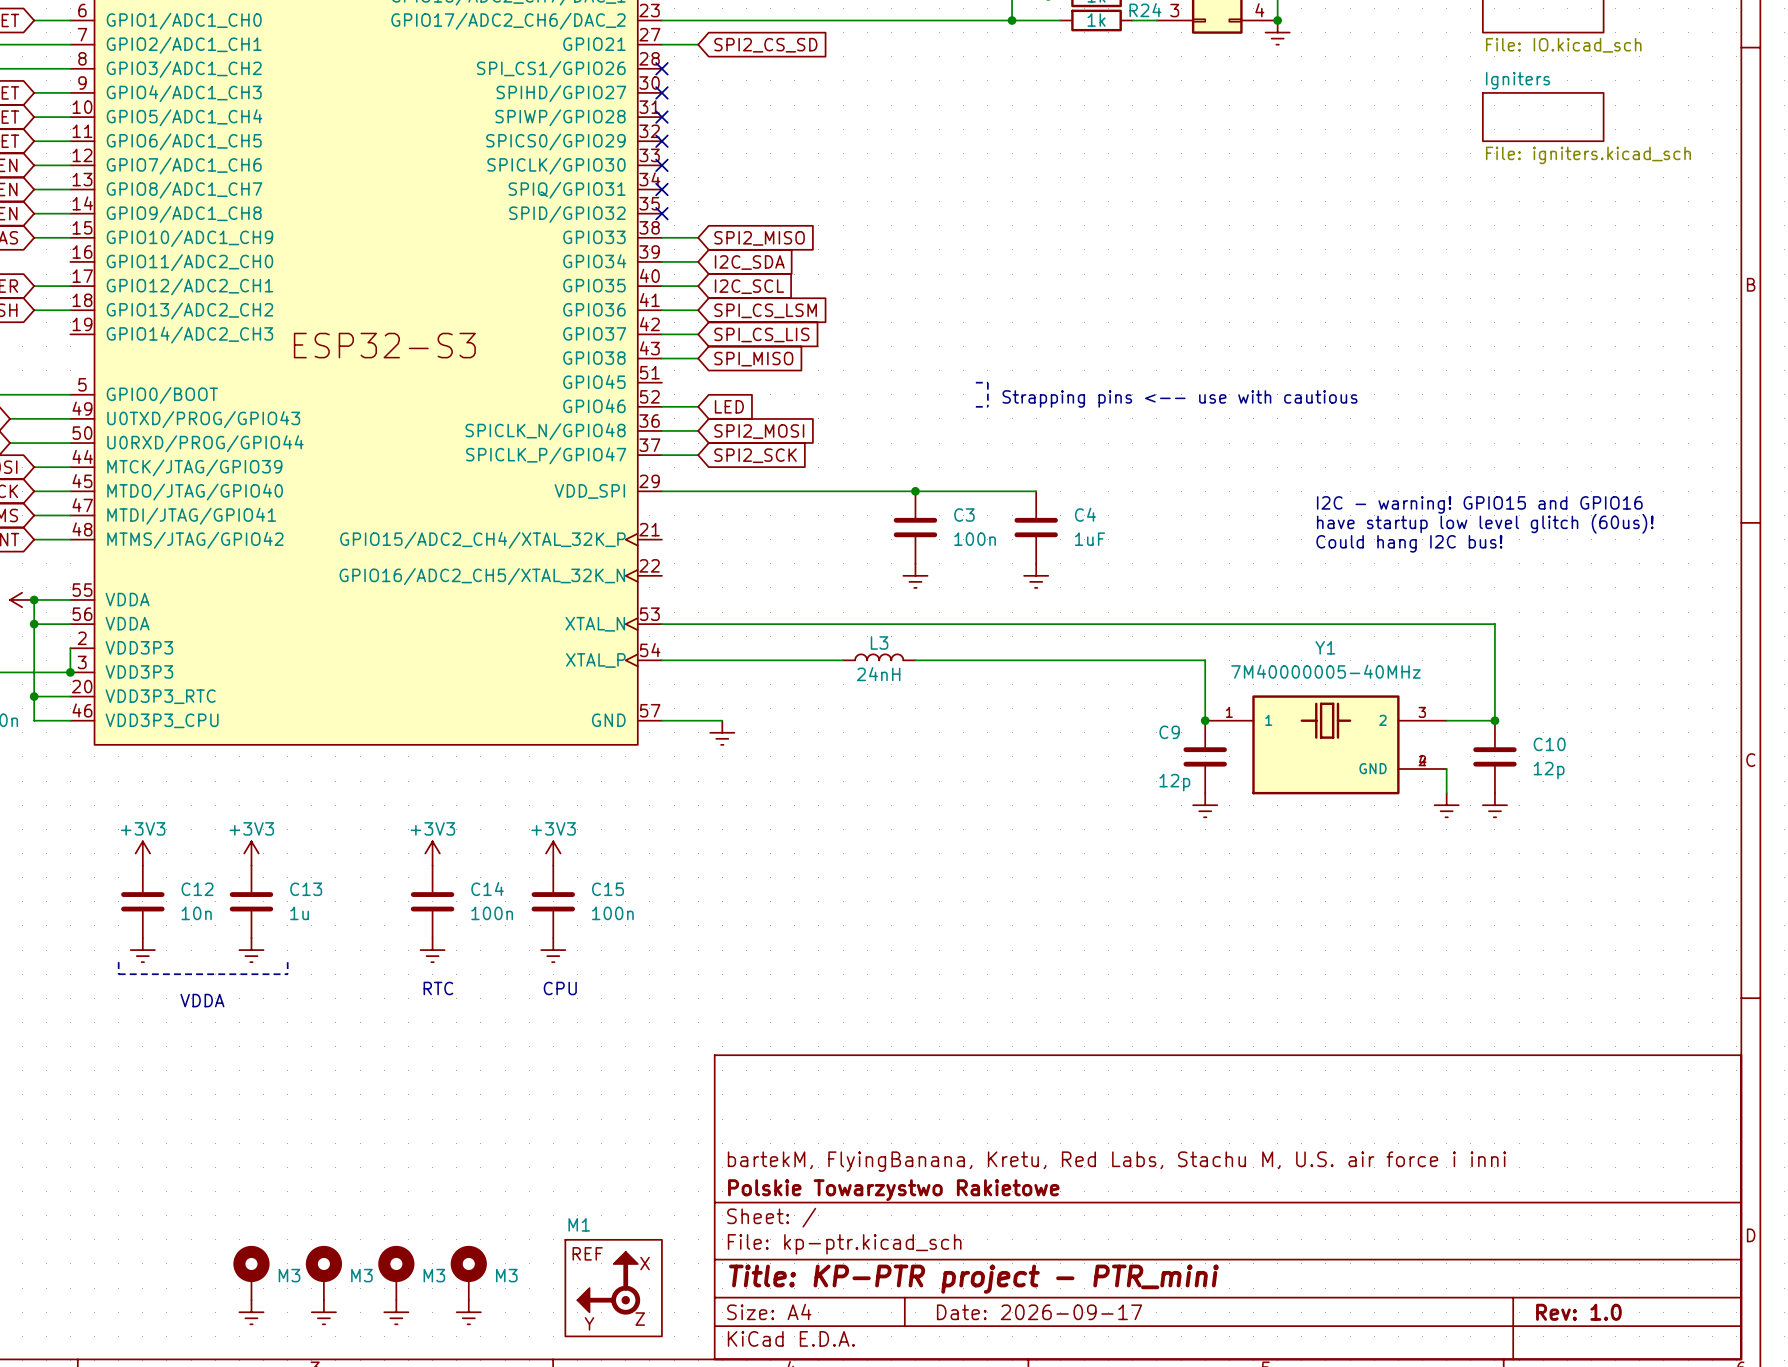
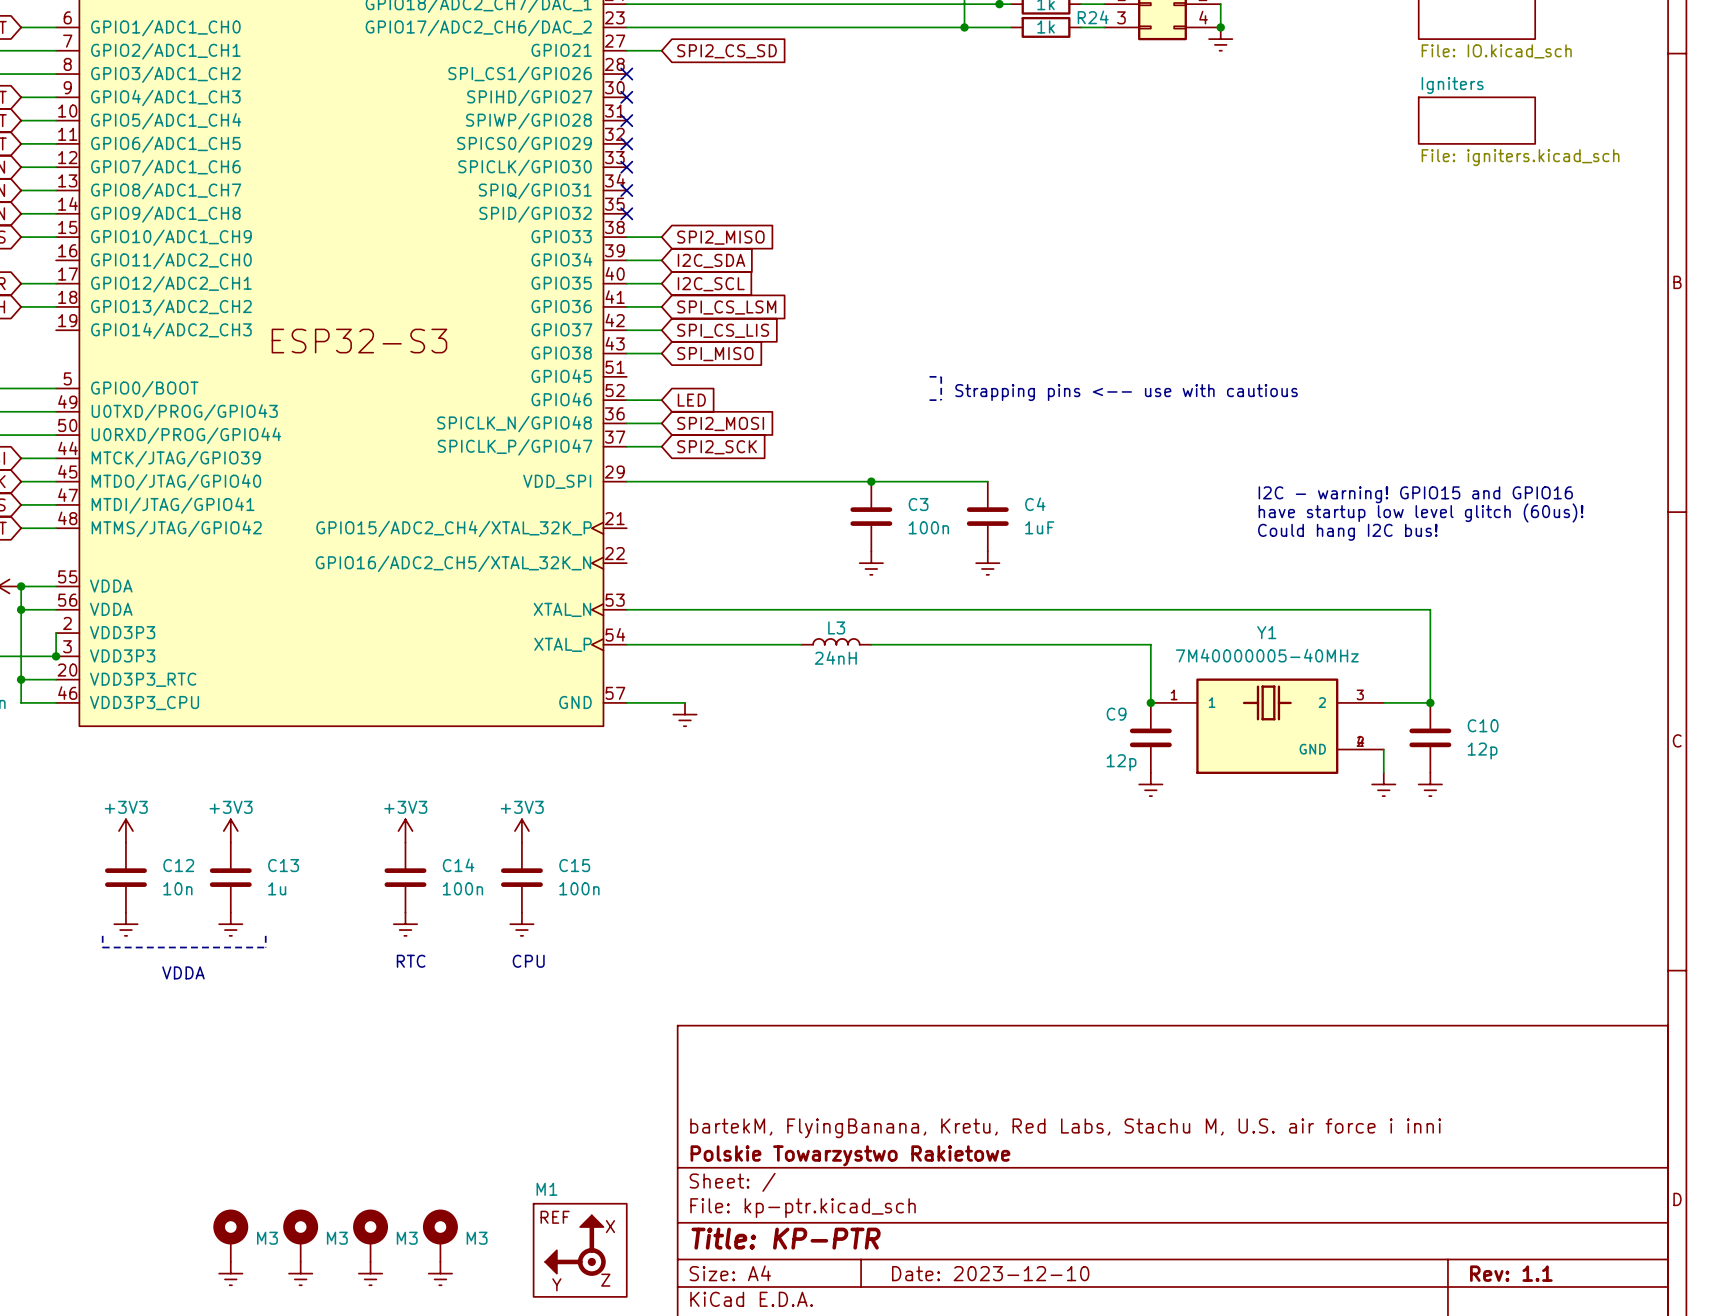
title block: Title: KP-PTR project - PTR_mini (973, 1279) -> Title: KP-PTR (786, 1238)
title block: Date: 2026-09-17 (1039, 1312) -> Date: 2023-12-10 (990, 1273)
title block: Rev: 1.0 (1578, 1312) -> Rev: 1.1 (1511, 1273)

